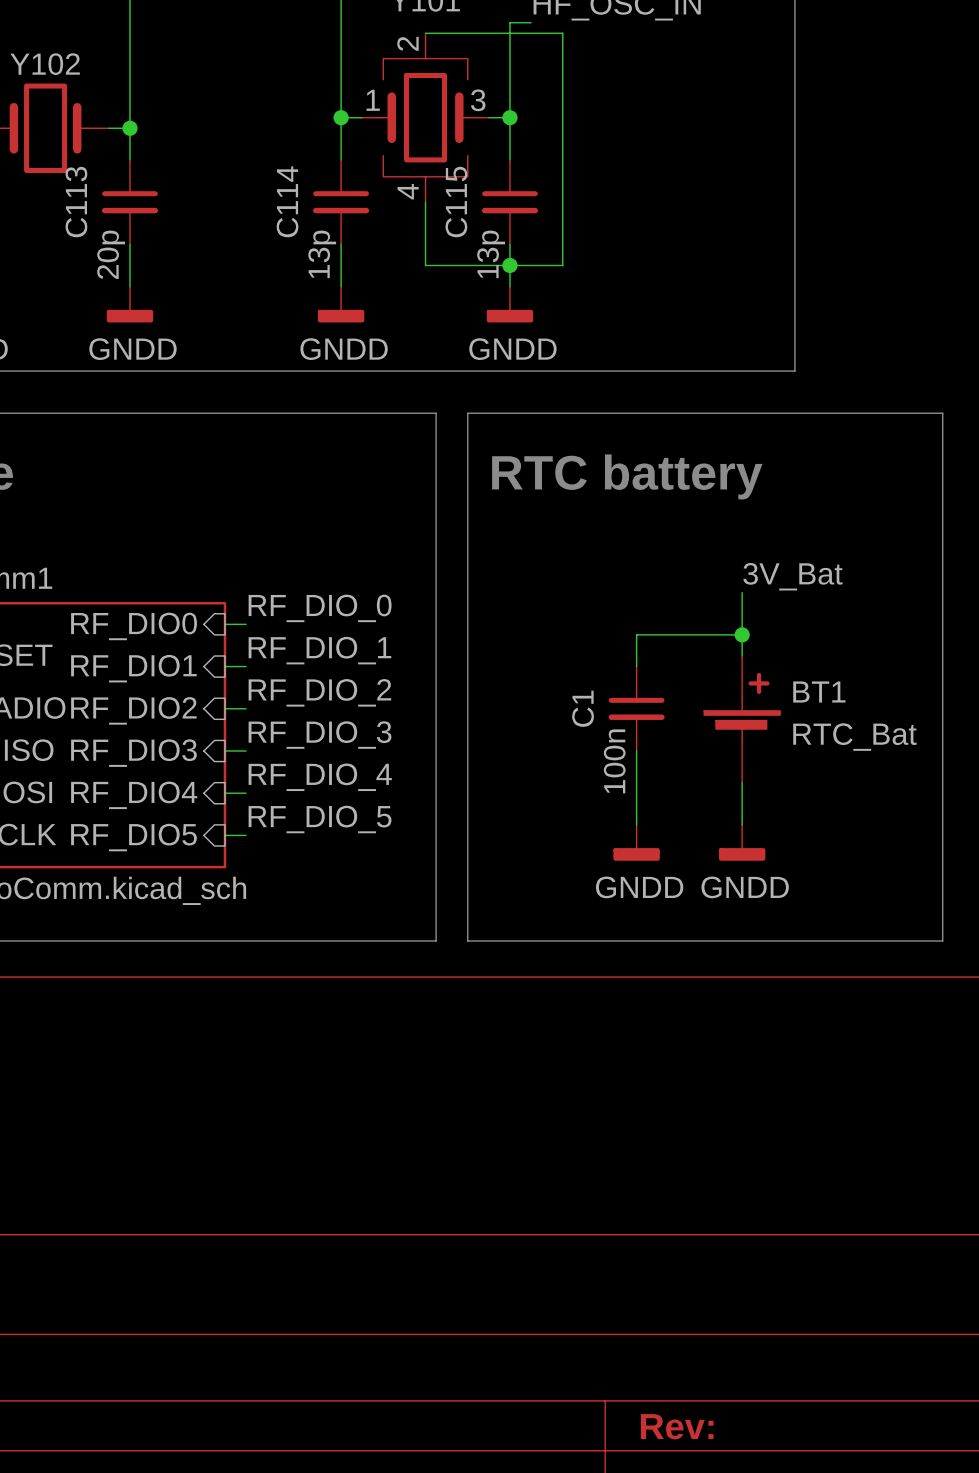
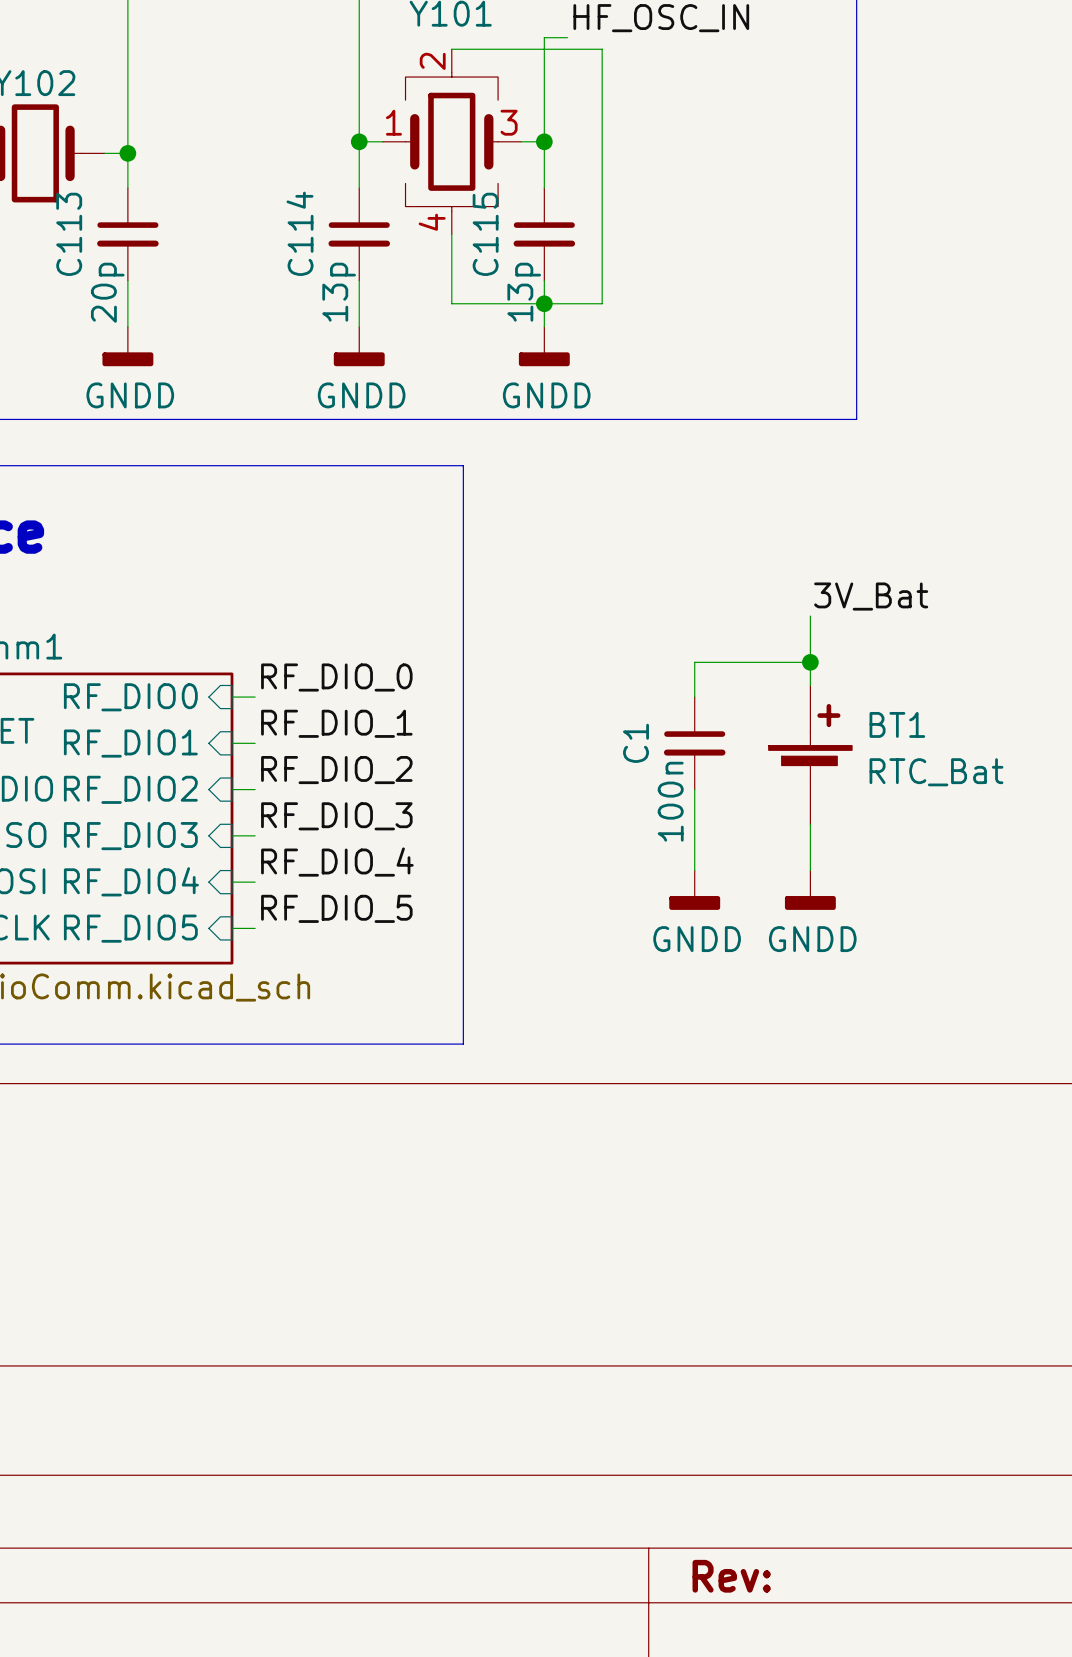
line: (467, 413) (942, 413) (942, 940) (467, 940) (467, 413) -> none
text: RTC battery (627, 476) -> none
label position: 3V_Bat (792, 576) -> 3V_Bat (871, 596)
wire: (742, 592) (742, 656) -> (810, 616) (810, 685)
wire: (742, 634) (636, 634) (636, 666) -> (810, 662) (694, 662) (694, 697)
junction position: (742, 634) -> (810, 662)
C1 position: (636, 708) -> (694, 743)
BT1 position: (742, 719) -> (810, 754)
wire: (636, 750) (636, 824) -> (694, 789) (694, 870)
wire: (742, 782) (742, 824) -> (810, 824) (810, 870)
power symbol position: GNDD (636, 842) -> GNDD (694, 890)
power symbol position: GNDD (742, 842) -> GNDD (810, 890)

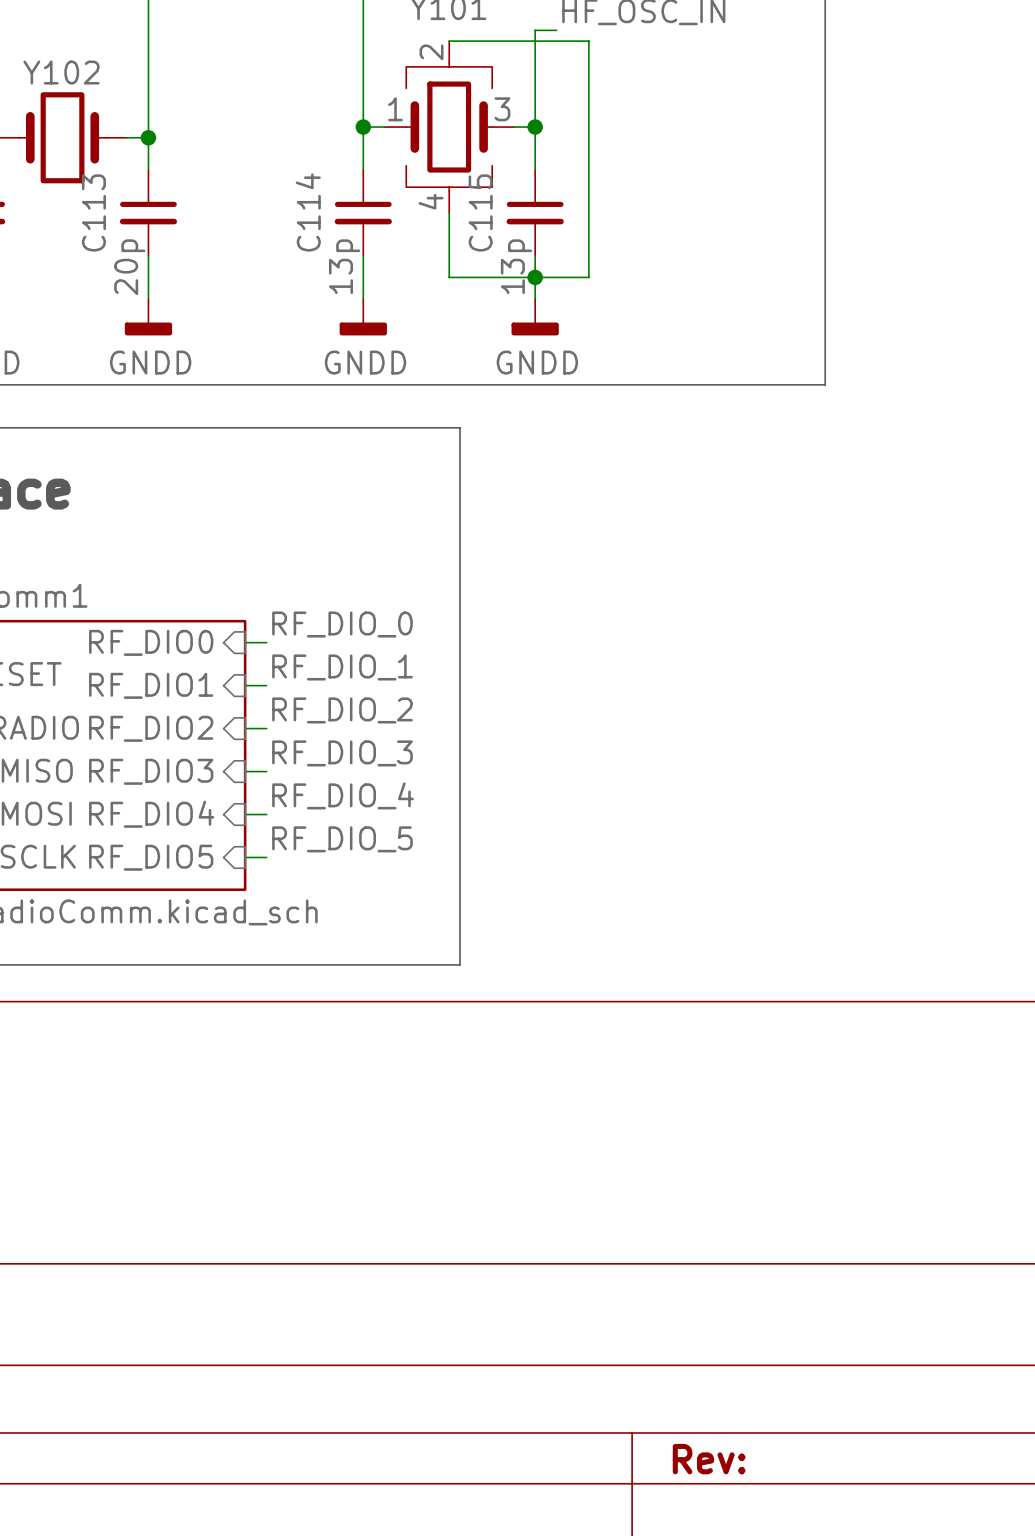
label: 3V_Bat (871, 596) -> none
wire: (810, 616) (810, 685) -> none
wire: (810, 662) (694, 662) (694, 697) -> none
junction: (810, 662) -> none
C1: 100n (694, 743) -> none
BT1: RTC_Bat (810, 754) -> none
wire: (694, 789) (694, 870) -> none
wire: (810, 824) (810, 870) -> none
power symbol: GNDD (694, 890) -> none
power symbol: GNDD (810, 890) -> none

